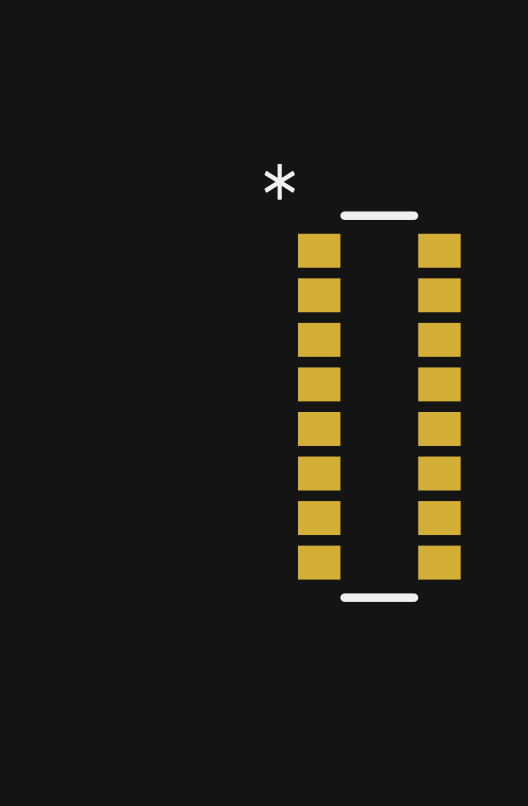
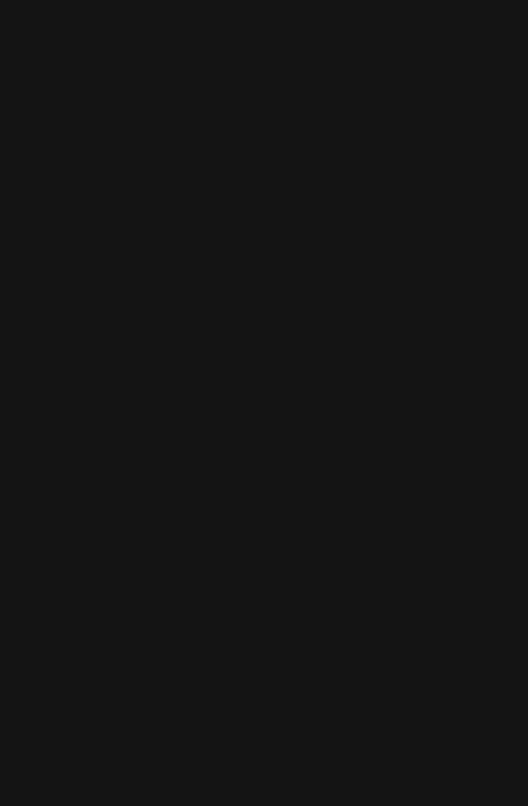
part: (379, 406) -> none

